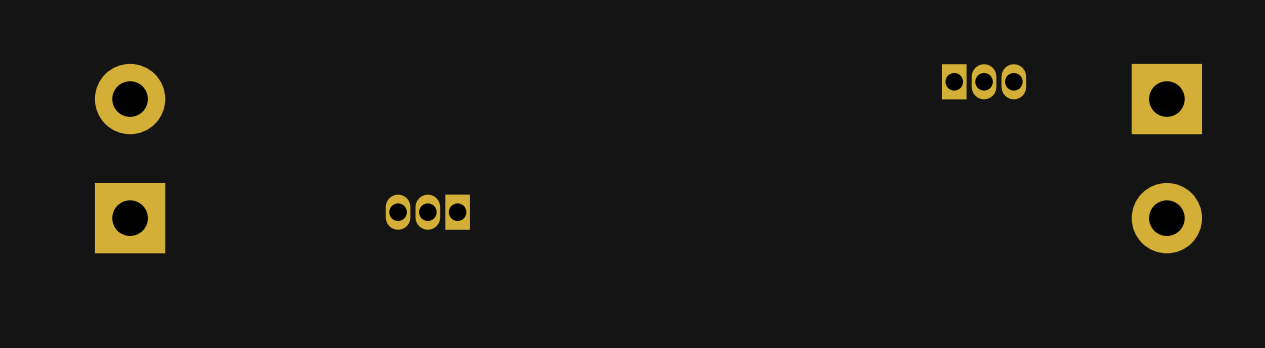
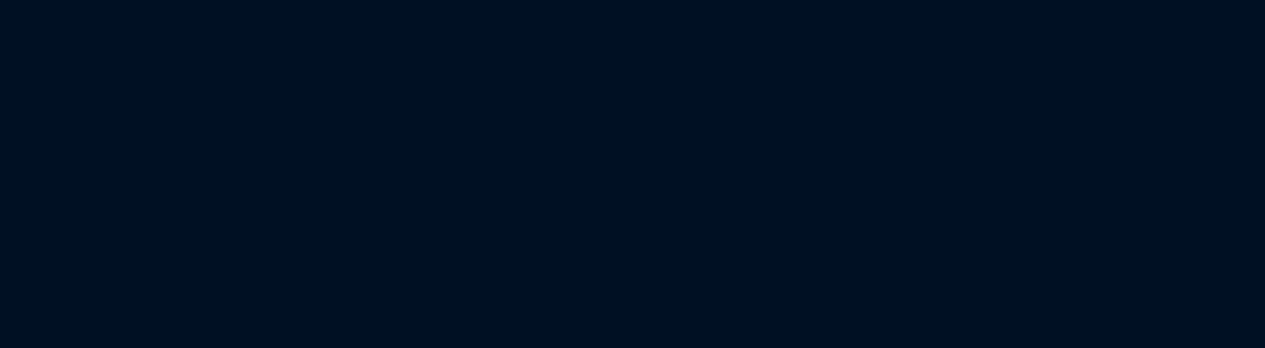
part: (984, 81) -> none
part: (130, 158) -> none
part: (1166, 158) -> none
part: (427, 212) -> none

